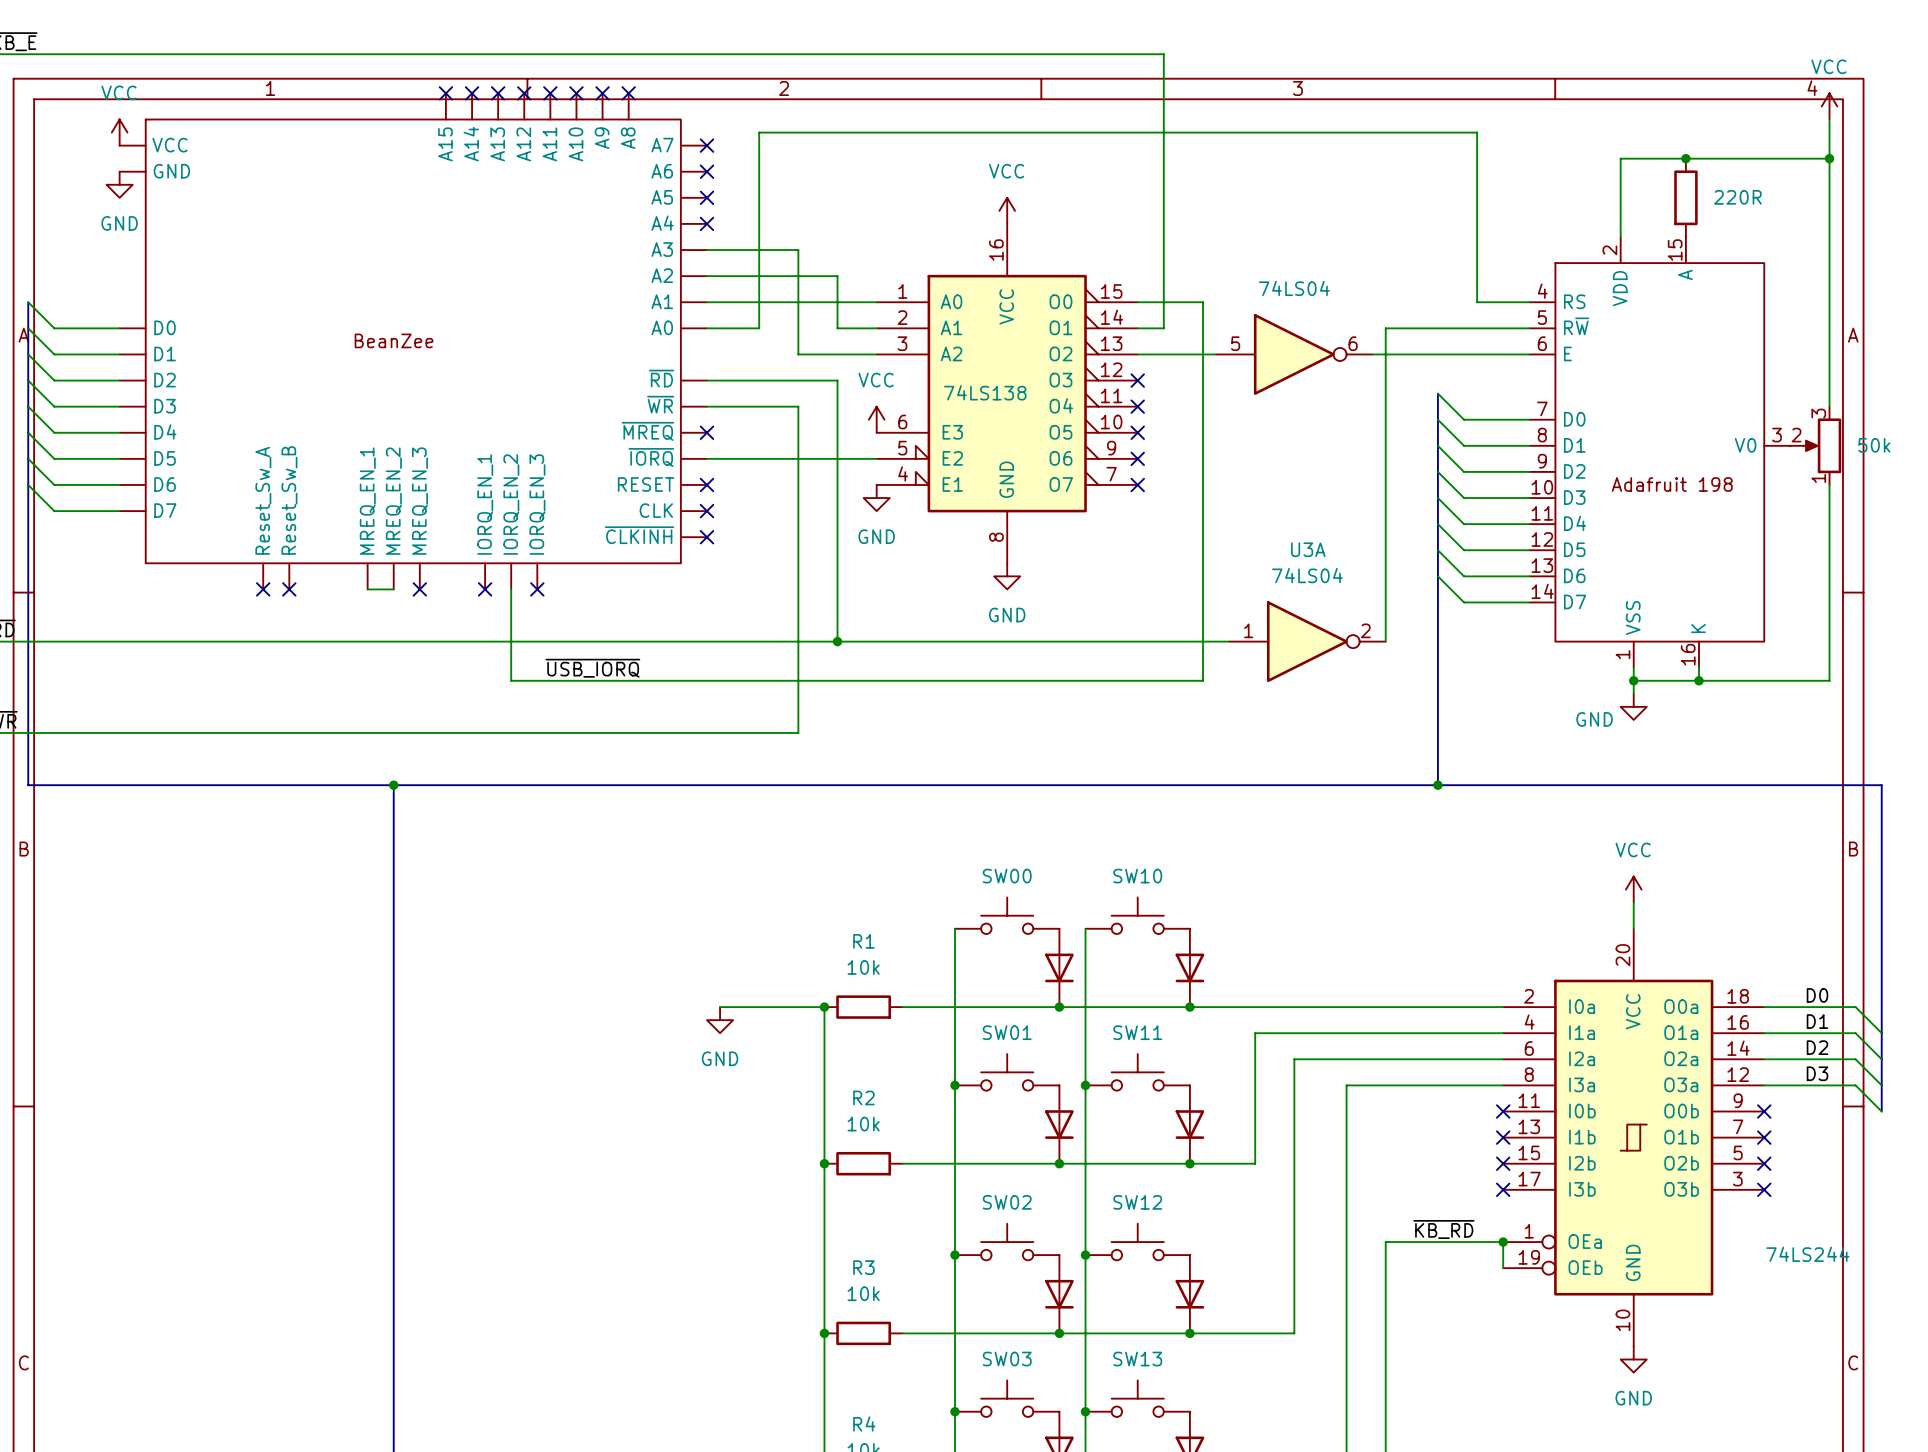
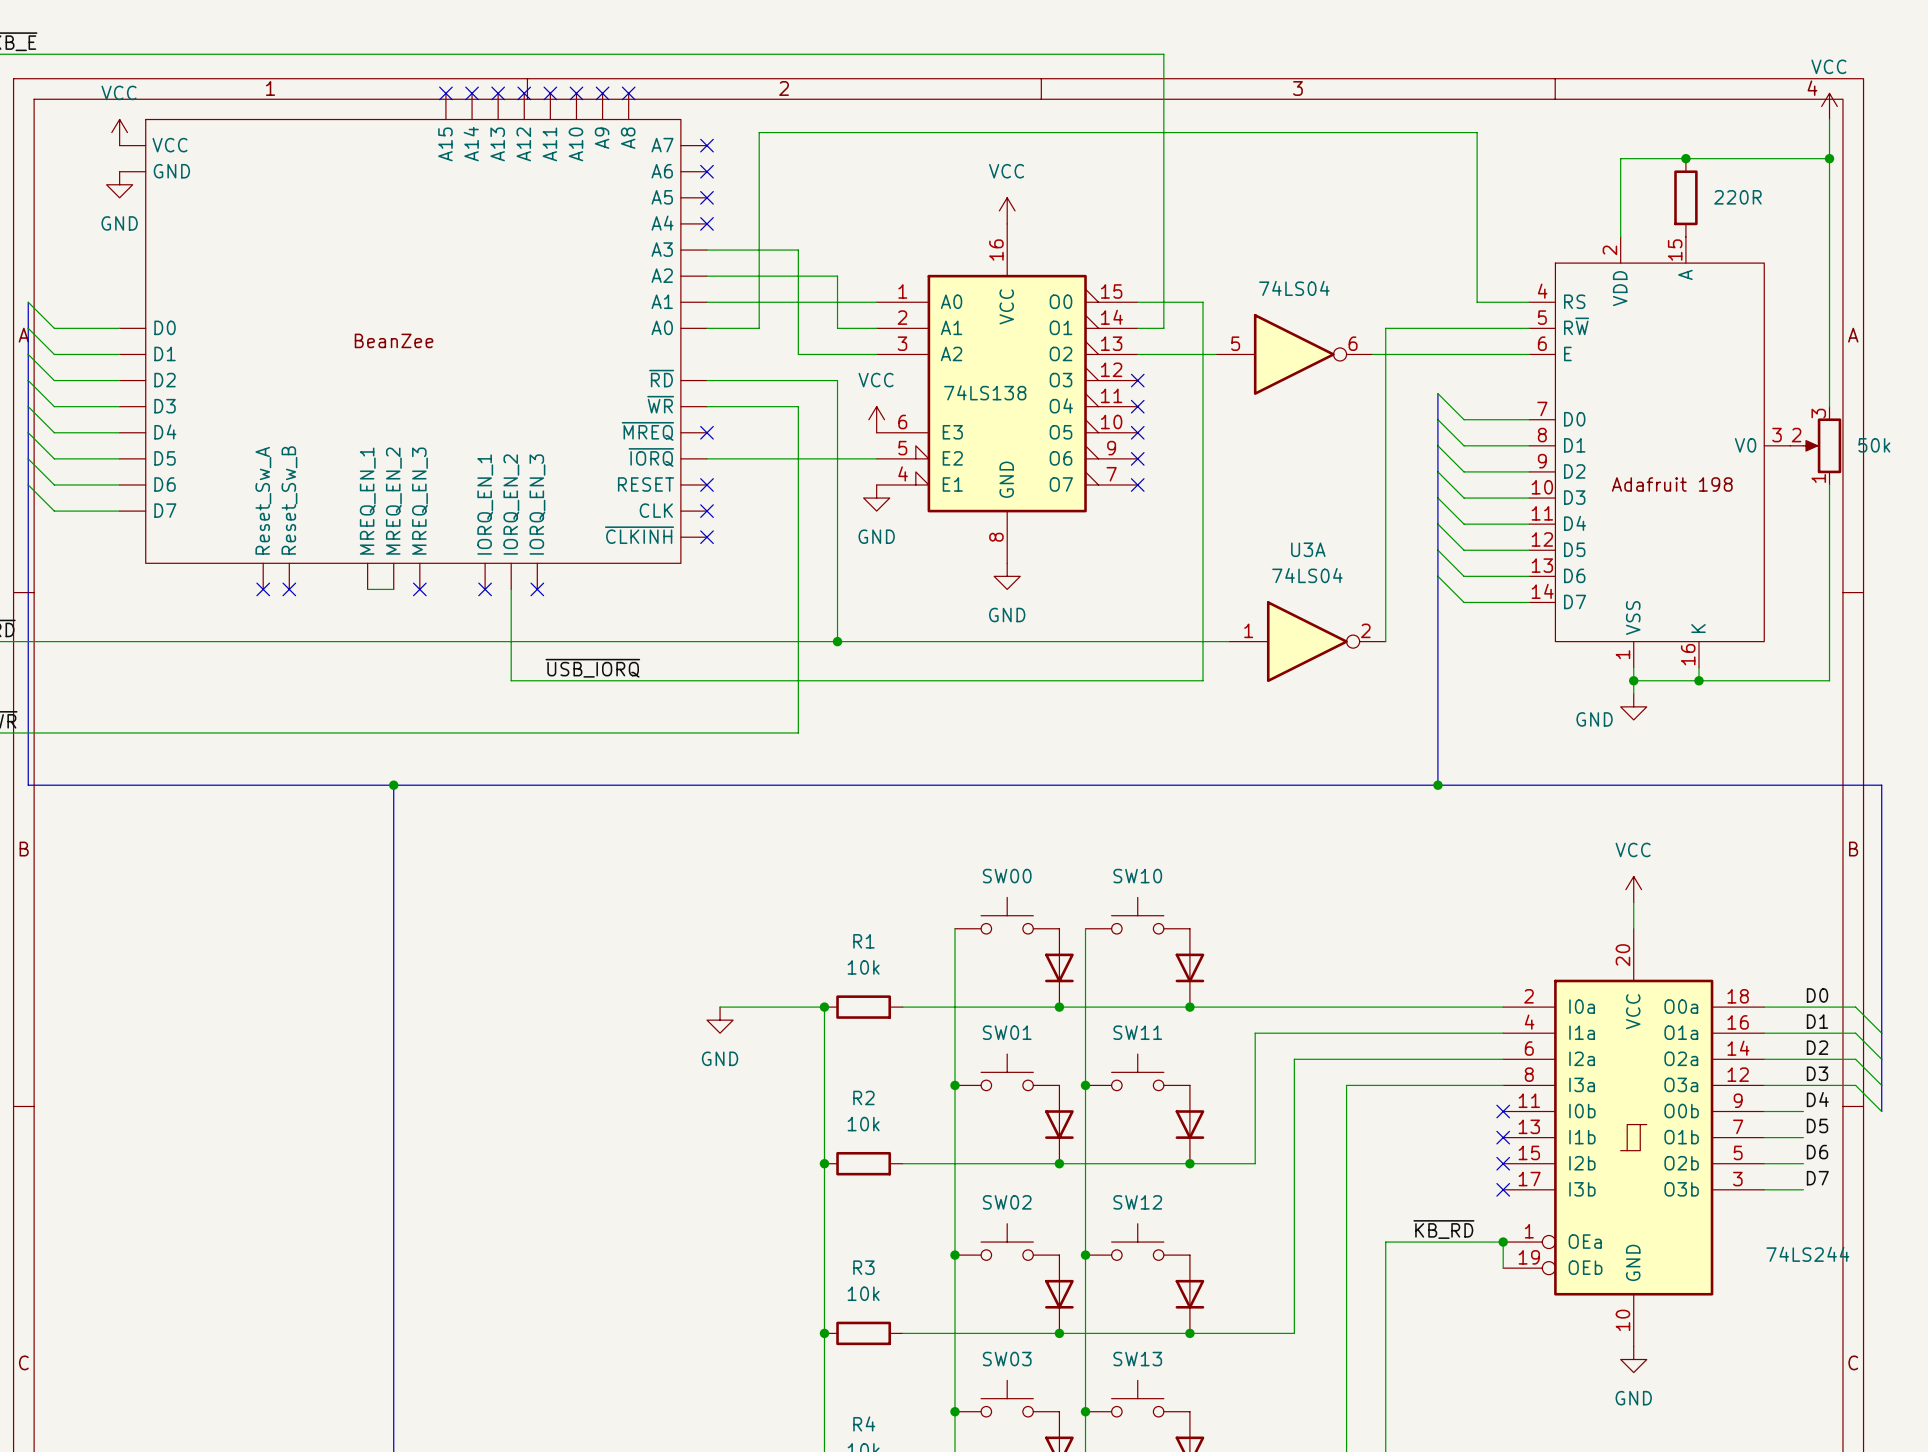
label: none -> D4 (1817, 1099)
wire: none -> (1764, 1111) (1803, 1111)
no-connect mark: (1764, 1111) -> none
label: none -> D5 (1817, 1125)
wire: none -> (1764, 1137) (1803, 1137)
no-connect mark: (1764, 1137) -> none
label: none -> D6 (1817, 1152)
wire: none -> (1764, 1163) (1803, 1163)
no-connect mark: (1764, 1163) -> none
label: none -> D7 (1817, 1178)
wire: none -> (1764, 1189) (1803, 1189)
no-connect mark: (1764, 1189) -> none

